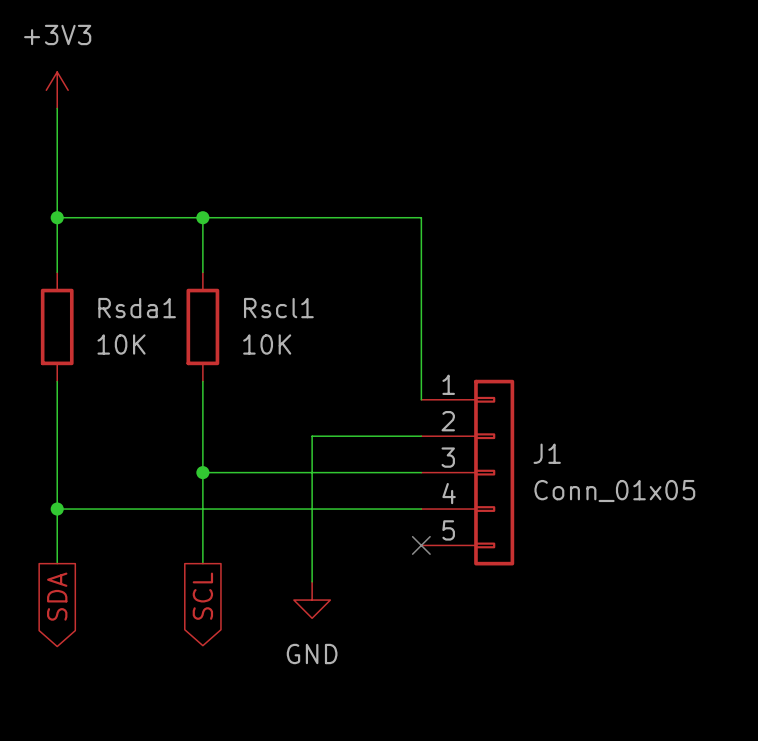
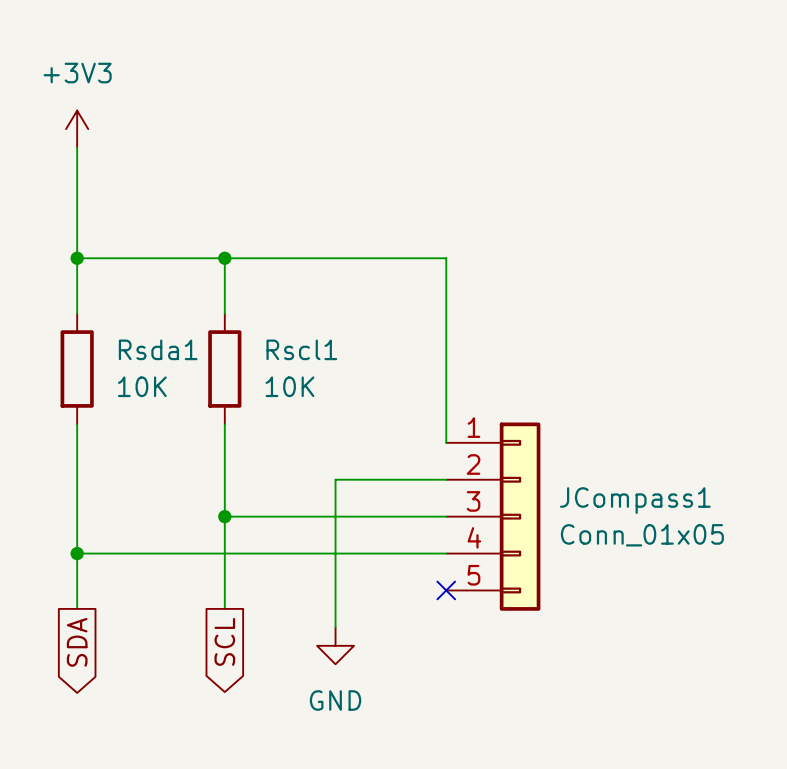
J1 name: J1 (547, 453) -> JCompass1 (635, 500)

